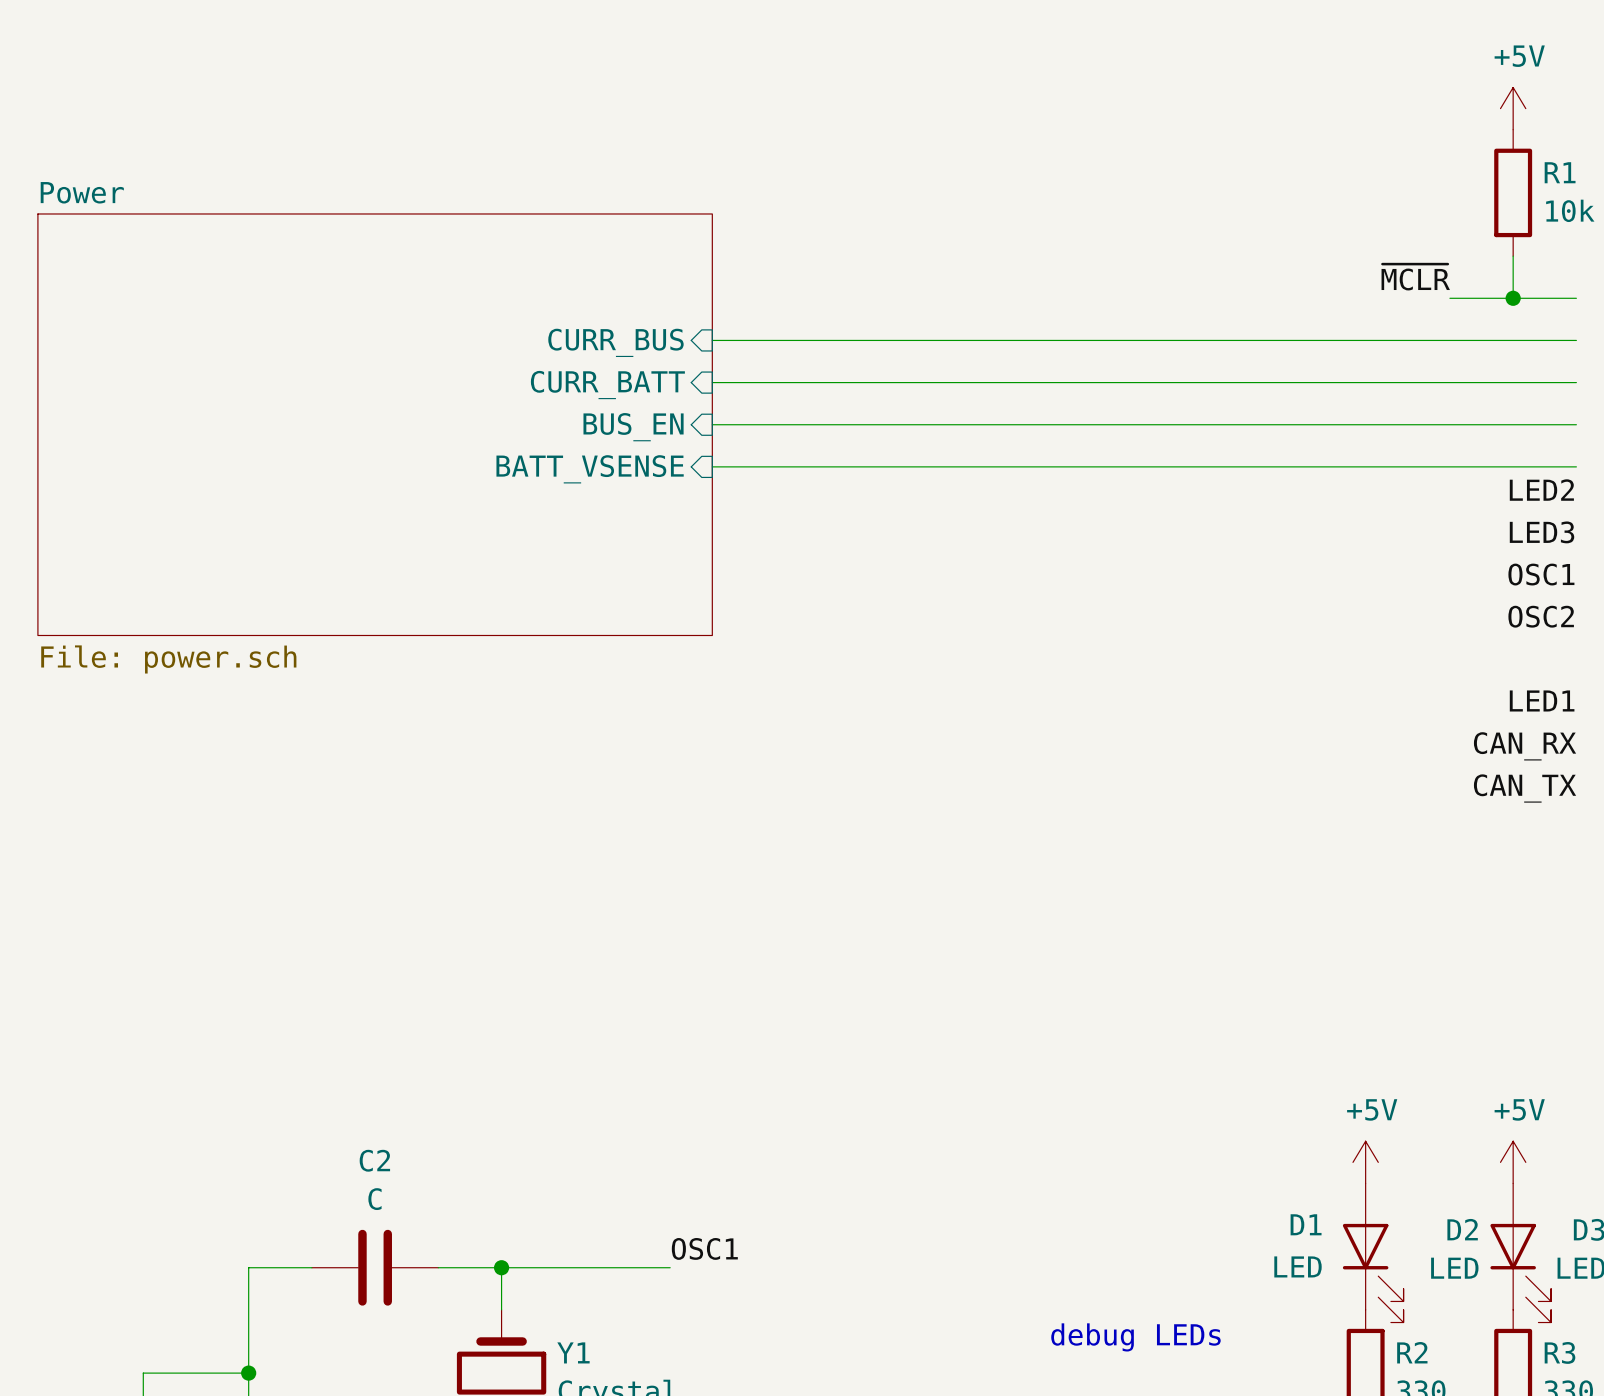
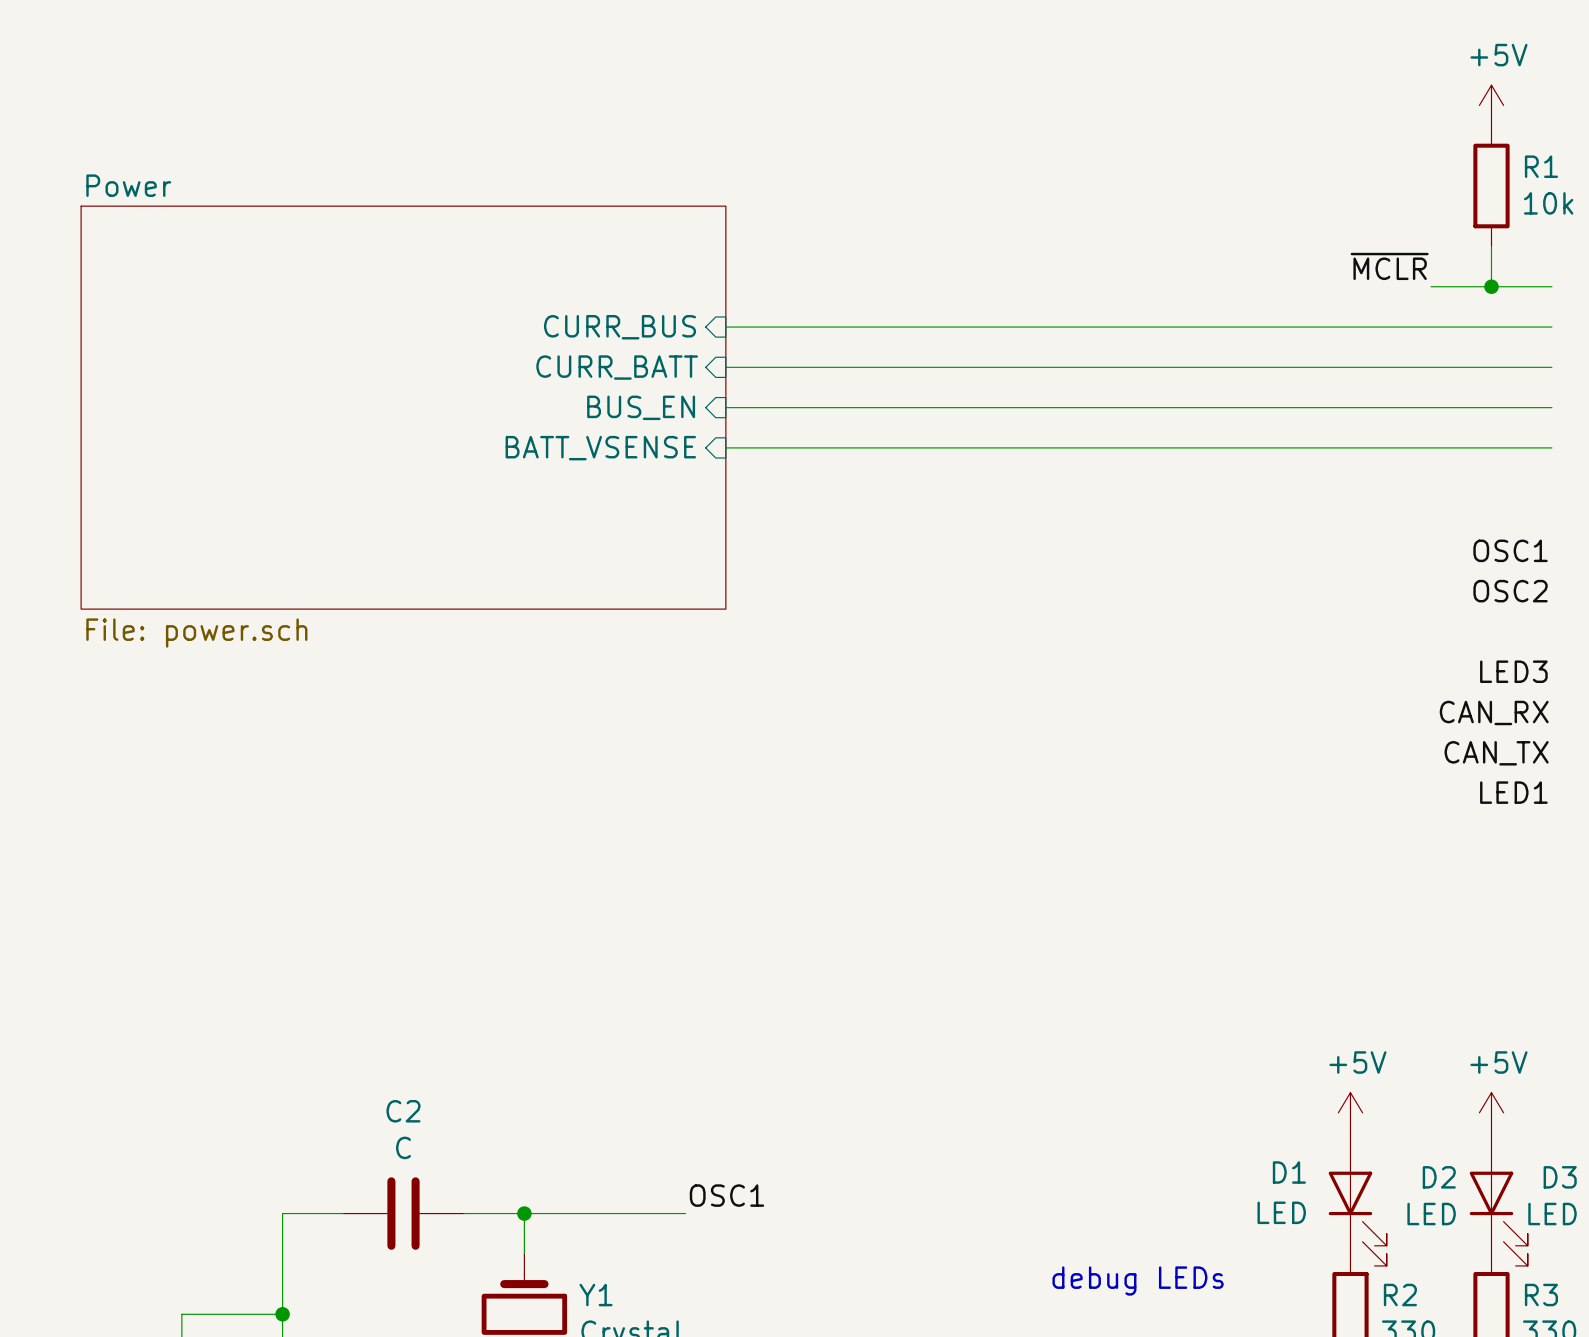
label: LED2 (1541, 490) -> none
label: LED3 (1542, 532) -> none
label: LED1 (1542, 700) -> LED3 (1513, 671)
label: none -> LED1 (1513, 792)

